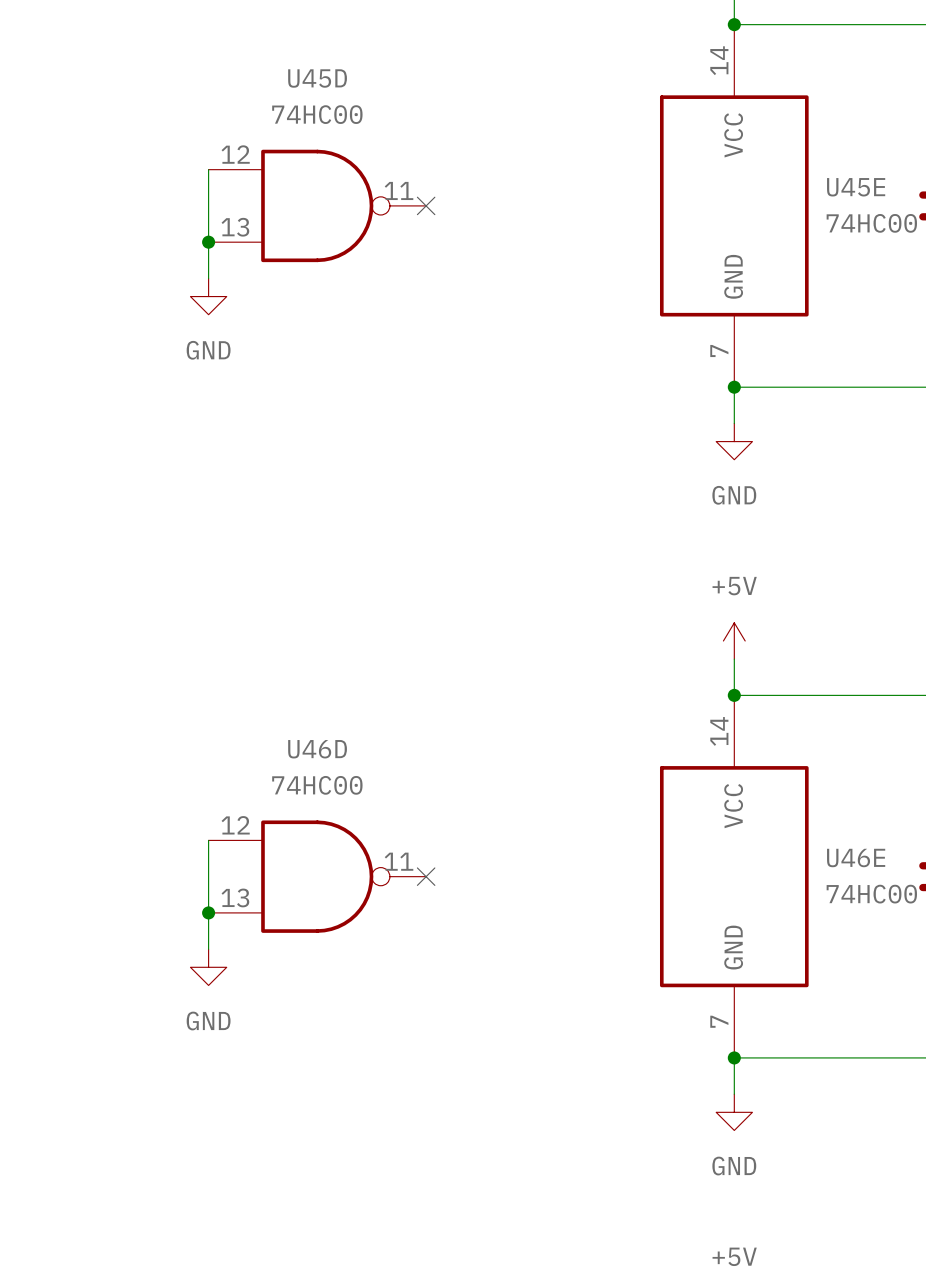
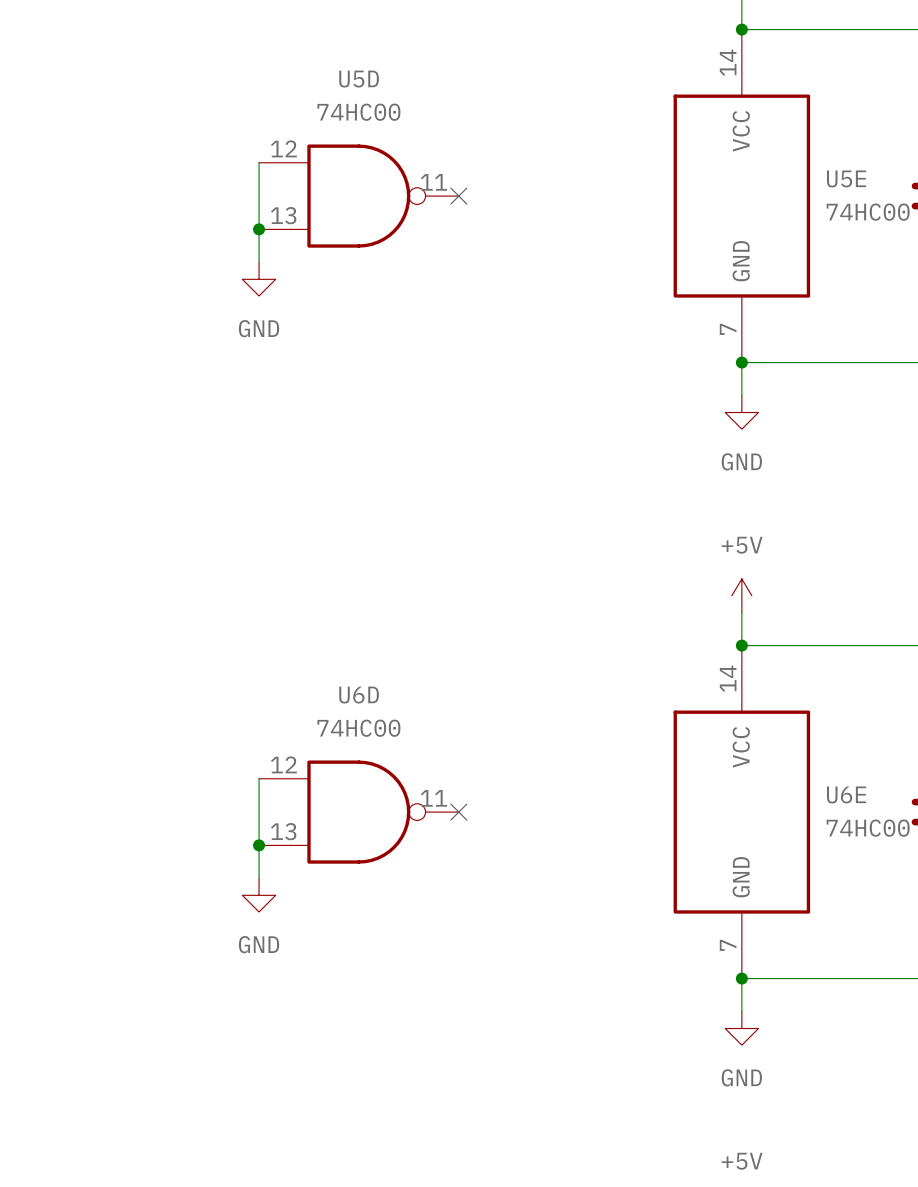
U45D name: U45D (317, 78) -> U5D (359, 79)
U45E name: U45E (856, 187) -> U5E (846, 178)
U46D name: U46D (317, 749) -> U6D (359, 695)
U46E name: U46E (856, 858) -> U6E (846, 794)

